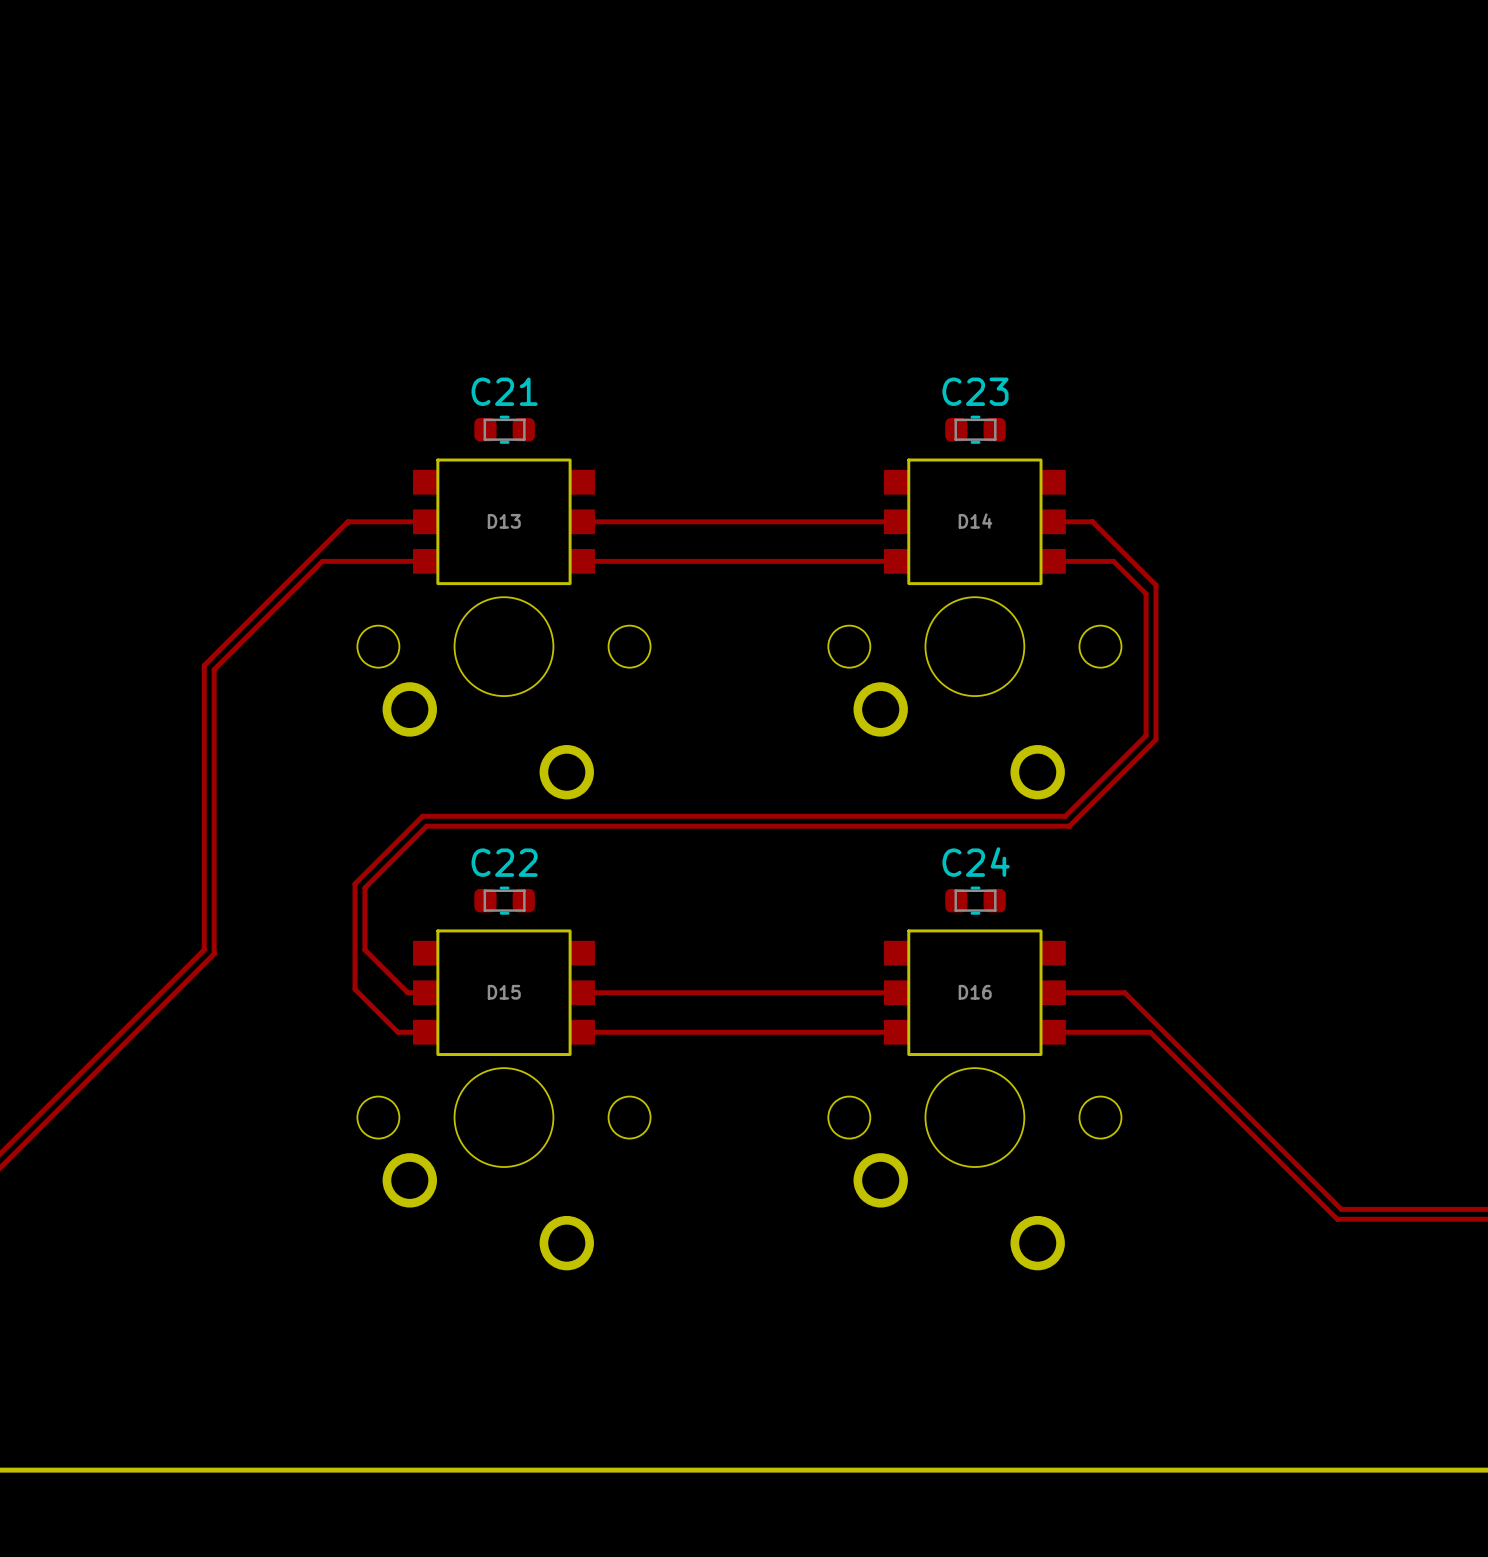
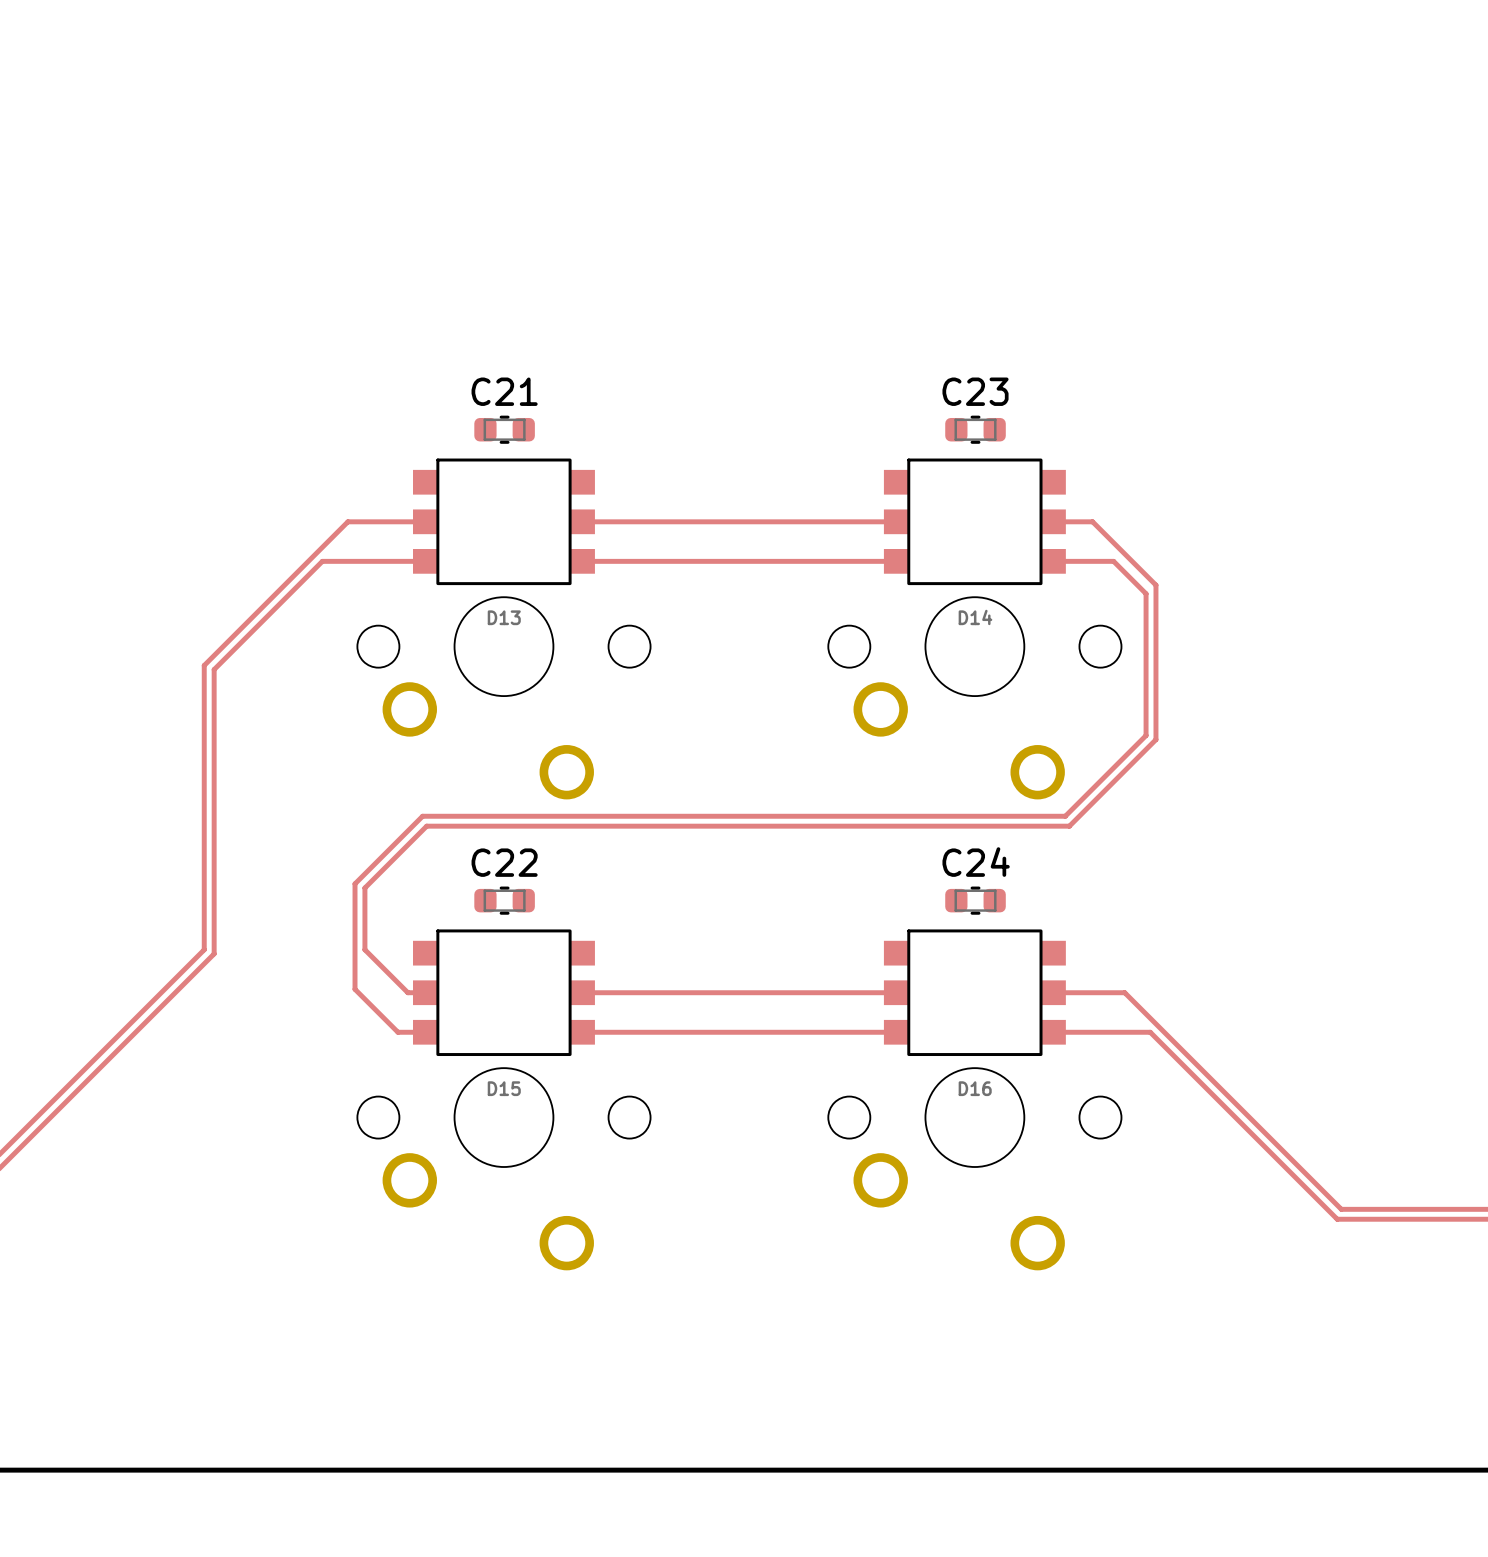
D13 name position: D13 (504, 521) -> D13 (504, 617)
D14 name position: D14 (975, 521) -> D14 (975, 617)
D15 name position: D15 (504, 992) -> D15 (504, 1088)
D16 name position: D16 (975, 992) -> D16 (975, 1088)

